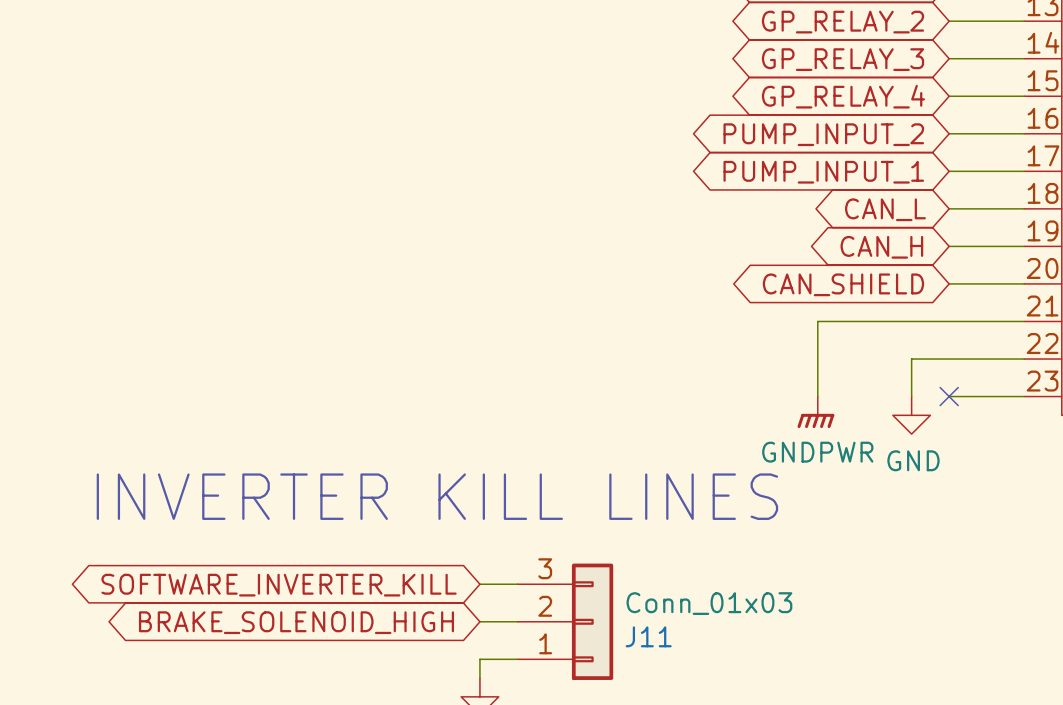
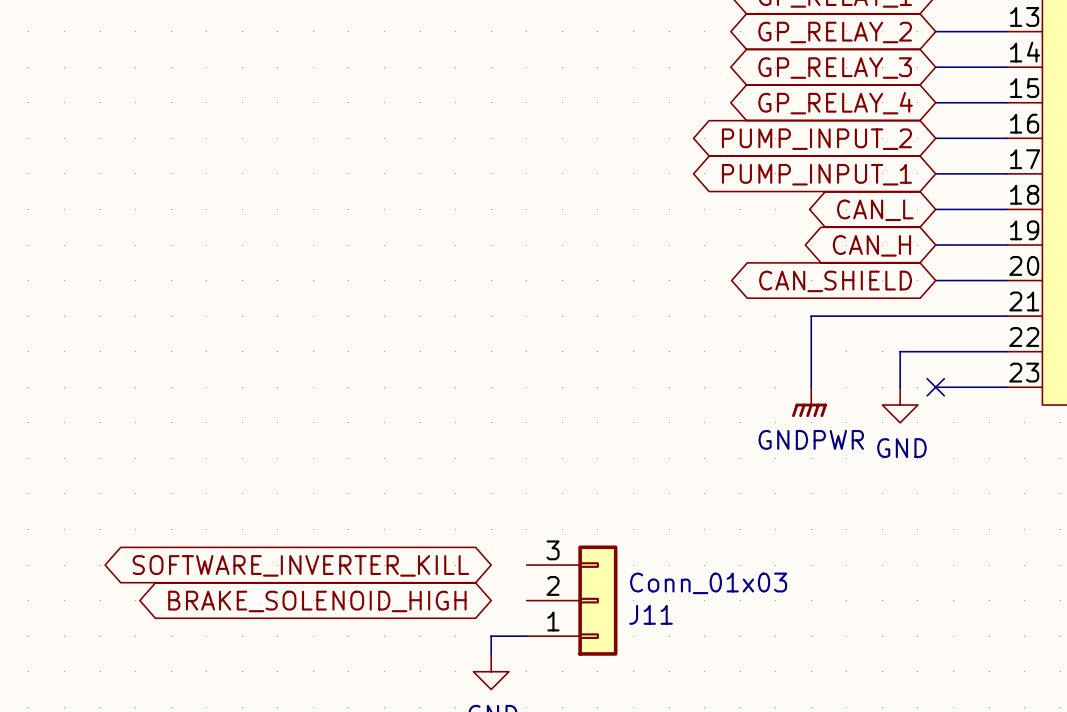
text: INVERTER KILL LINES (437, 496) -> none
wire: (479, 584) (517, 584) -> none
wire: (479, 621) (517, 621) -> none

